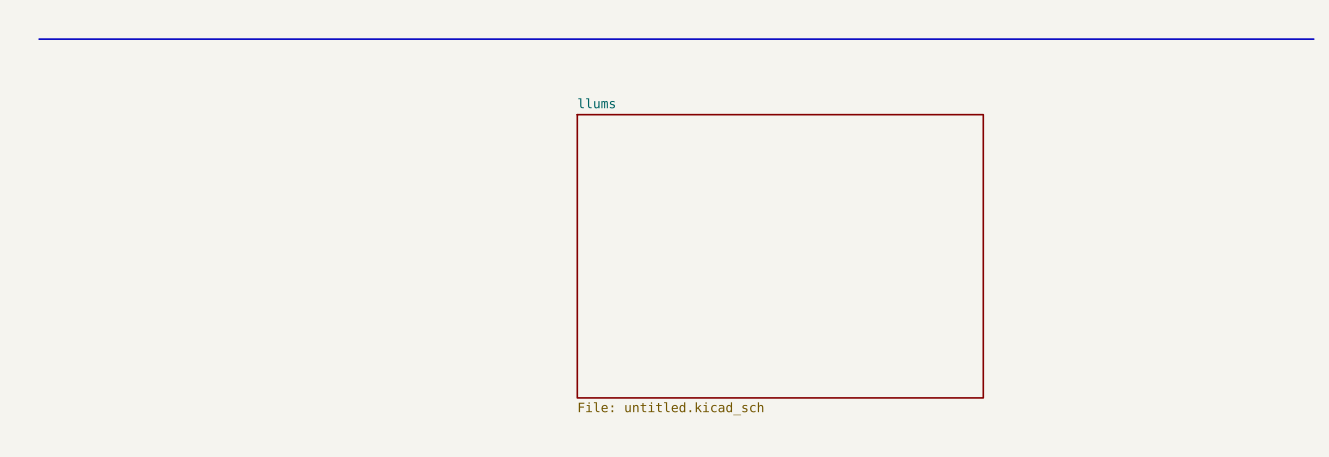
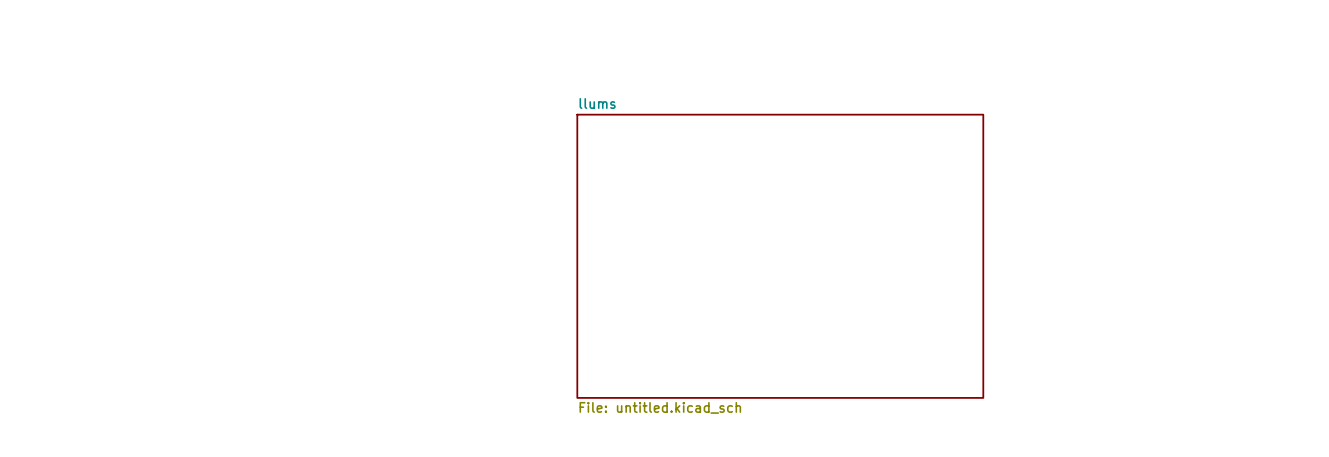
line: (39, 39) (1313, 39) -> none

